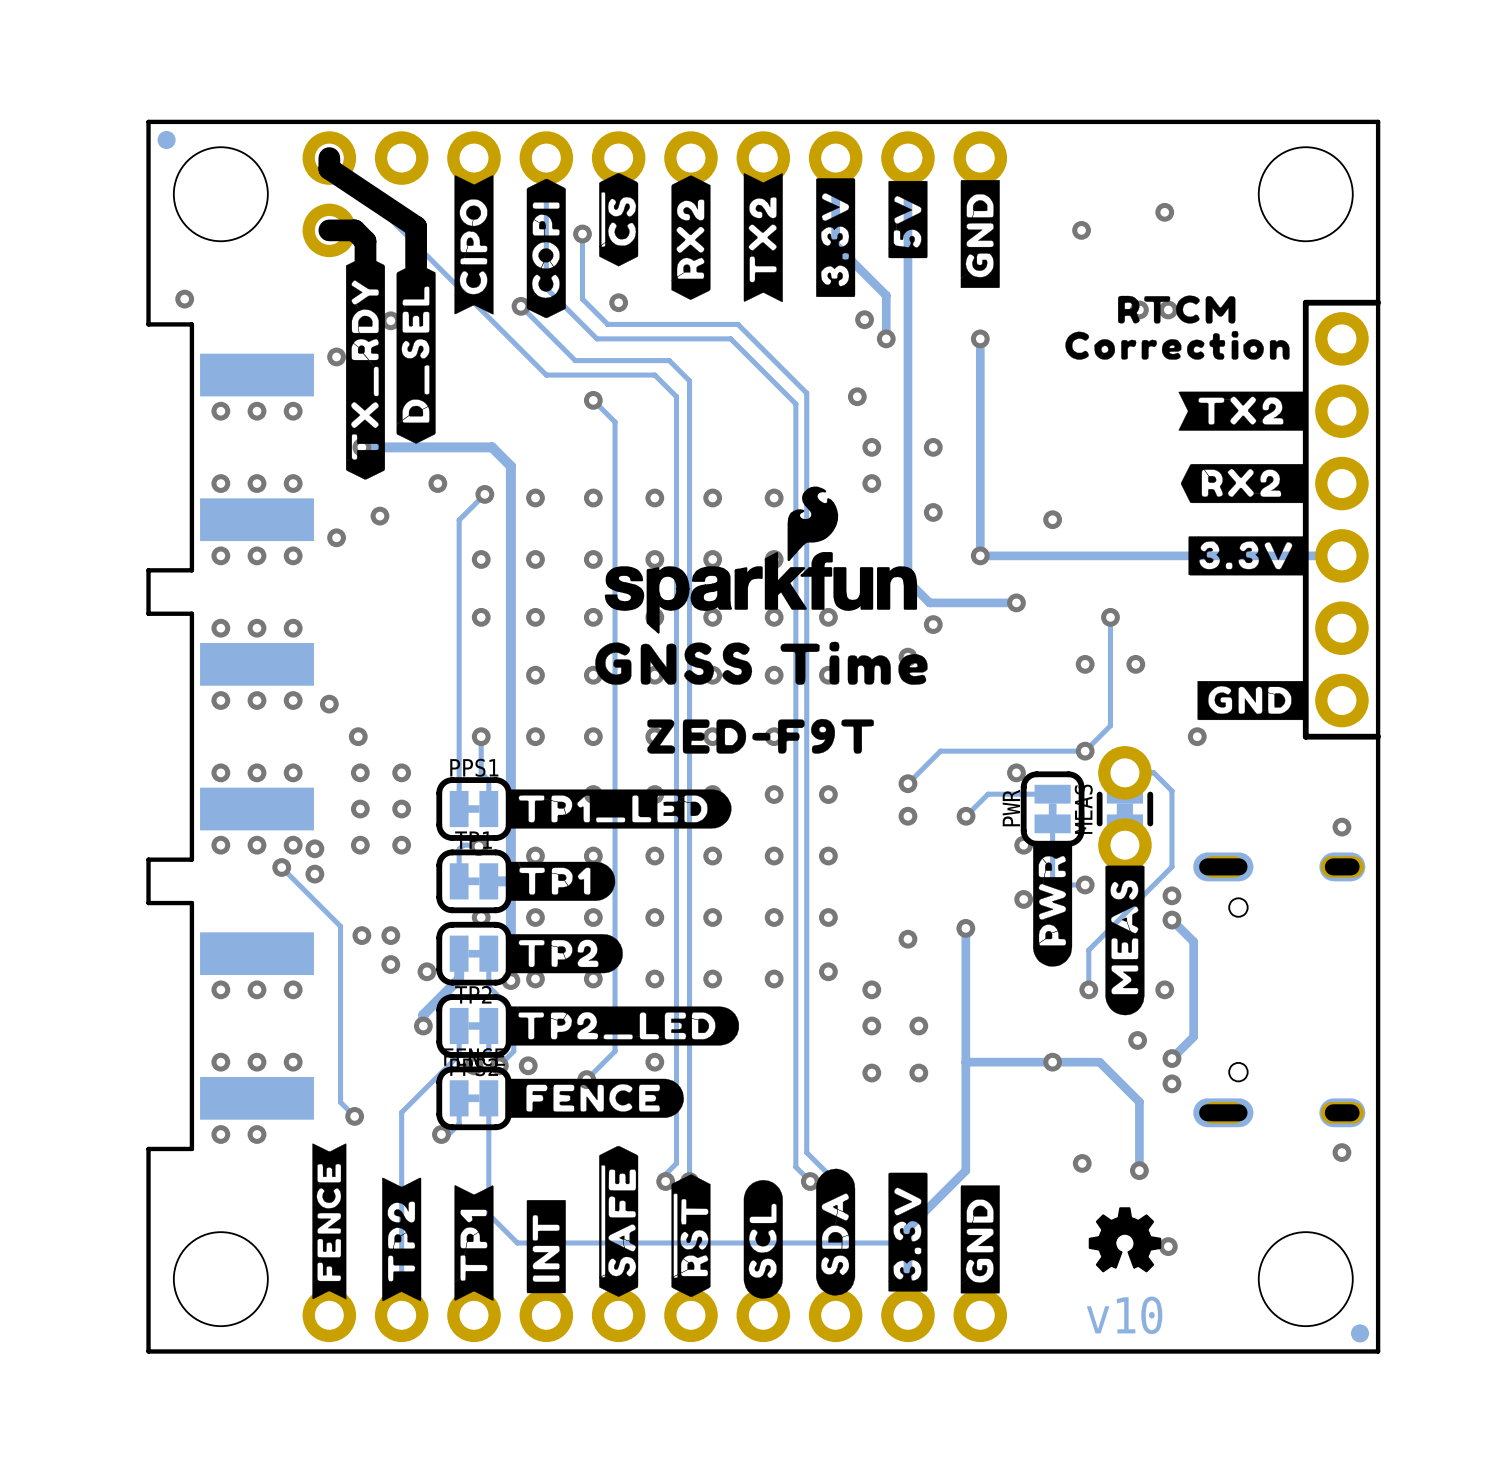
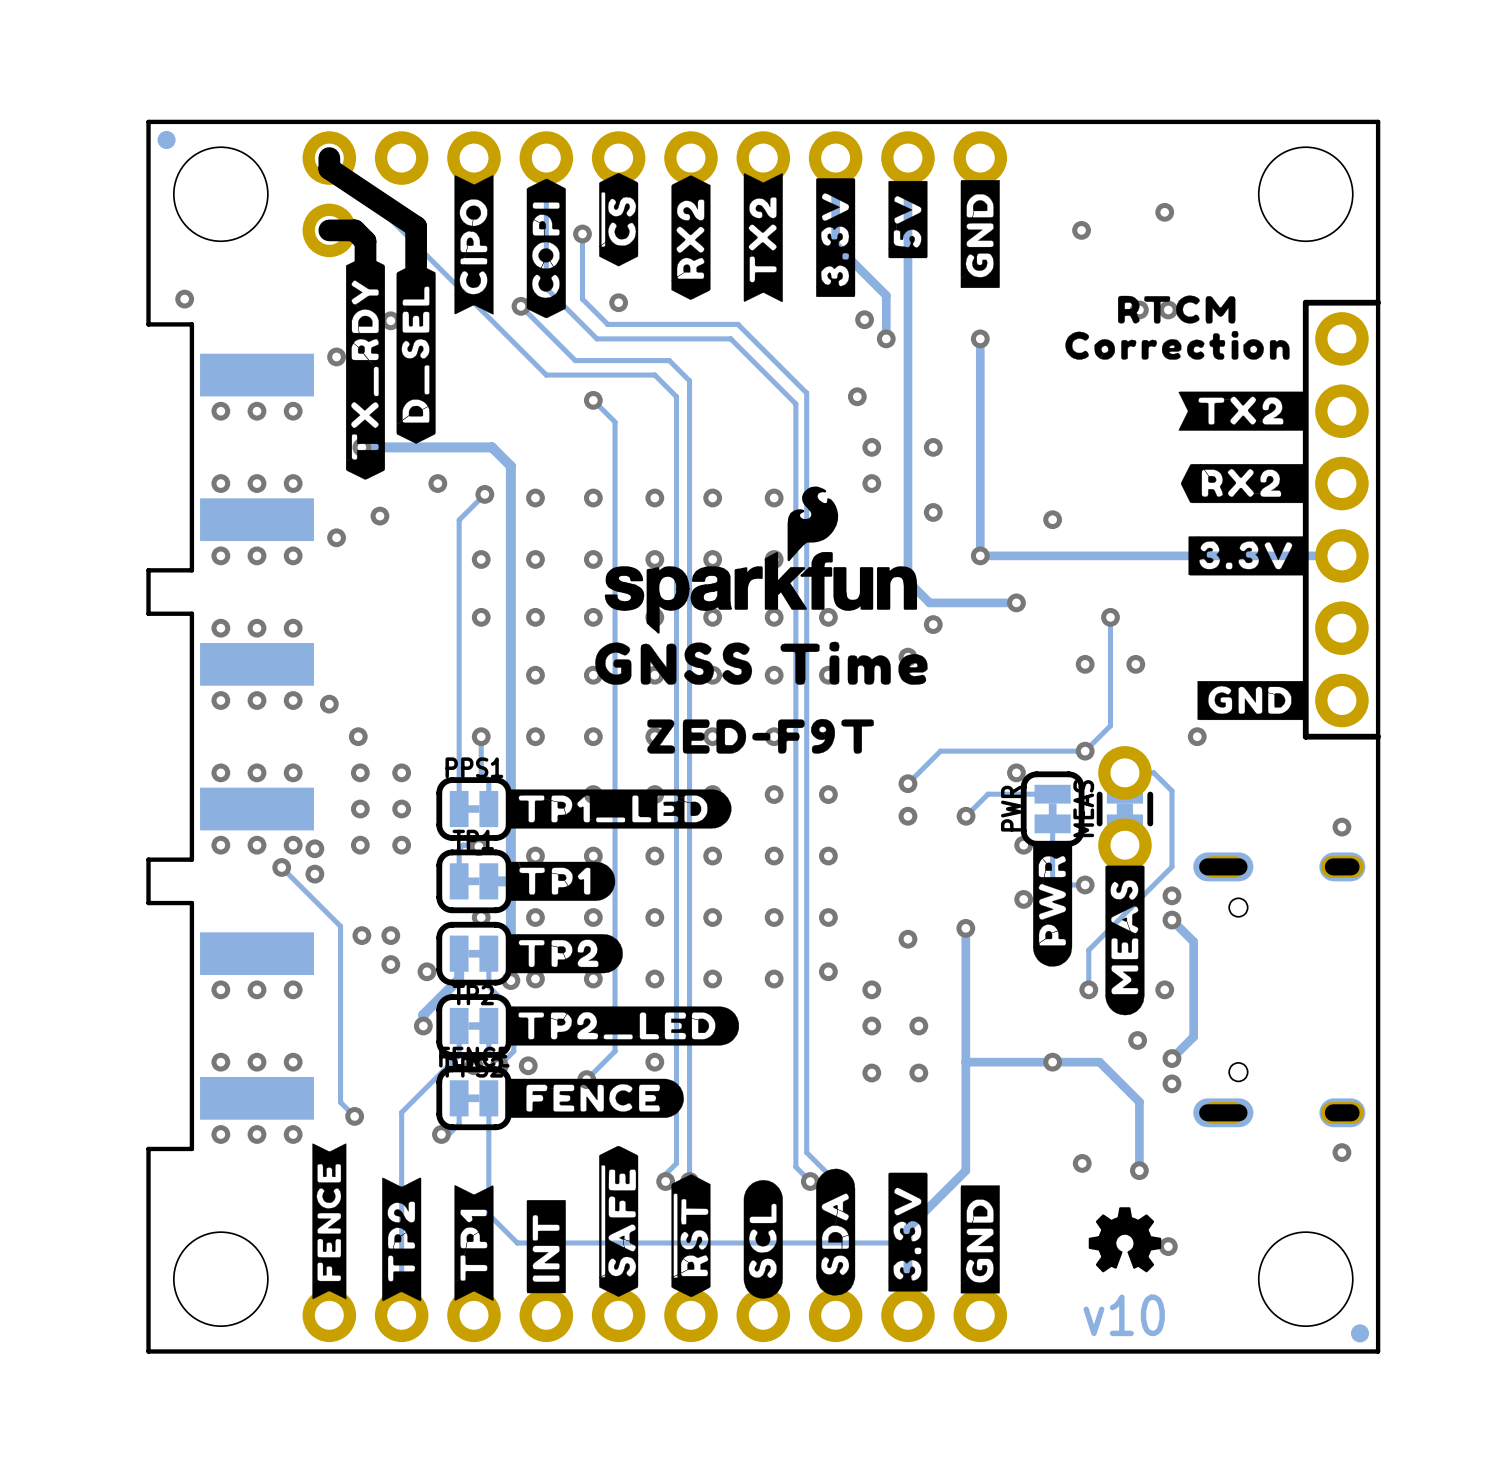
via: none -> (293, 1134)

